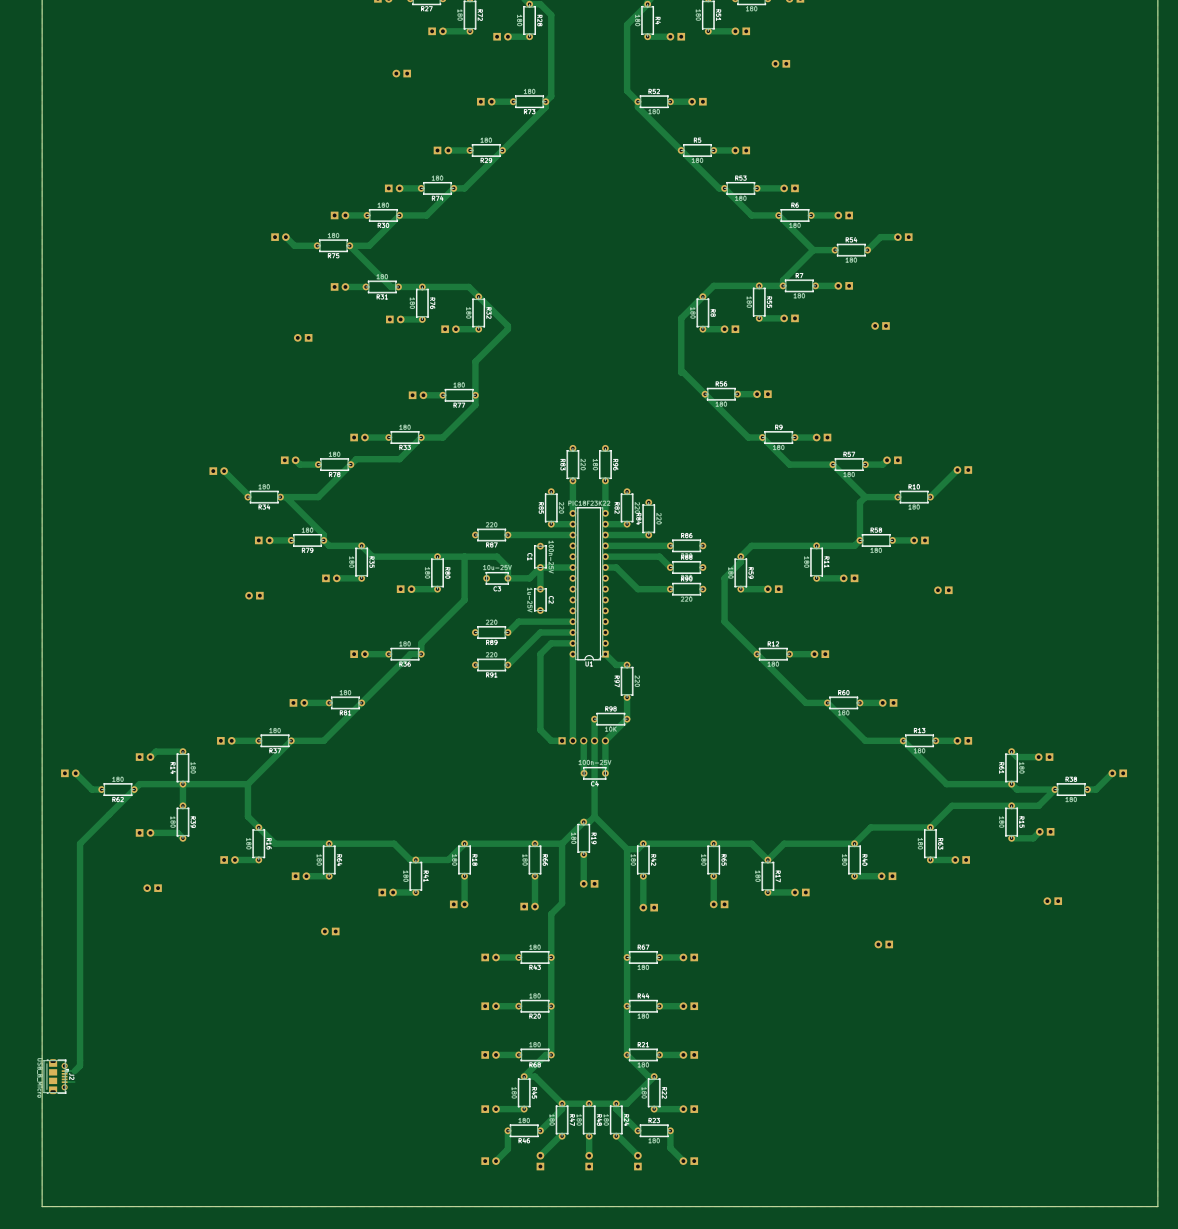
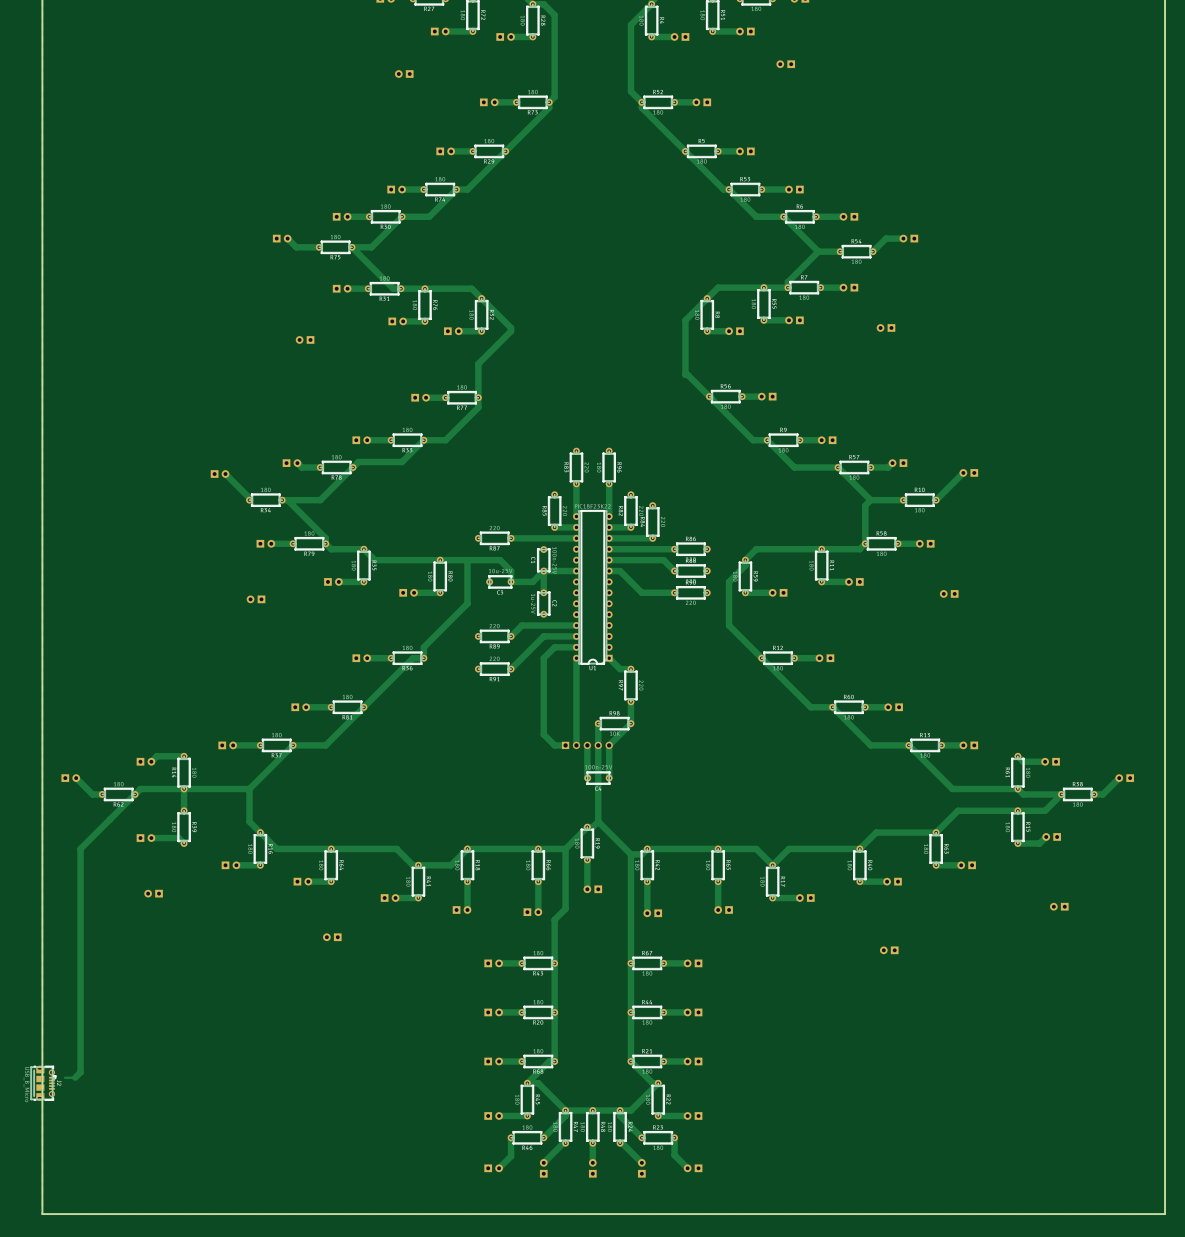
part position: (56, 1076) -> (43, 1083)
track: (74, 1082) (64, 1082) -> none

